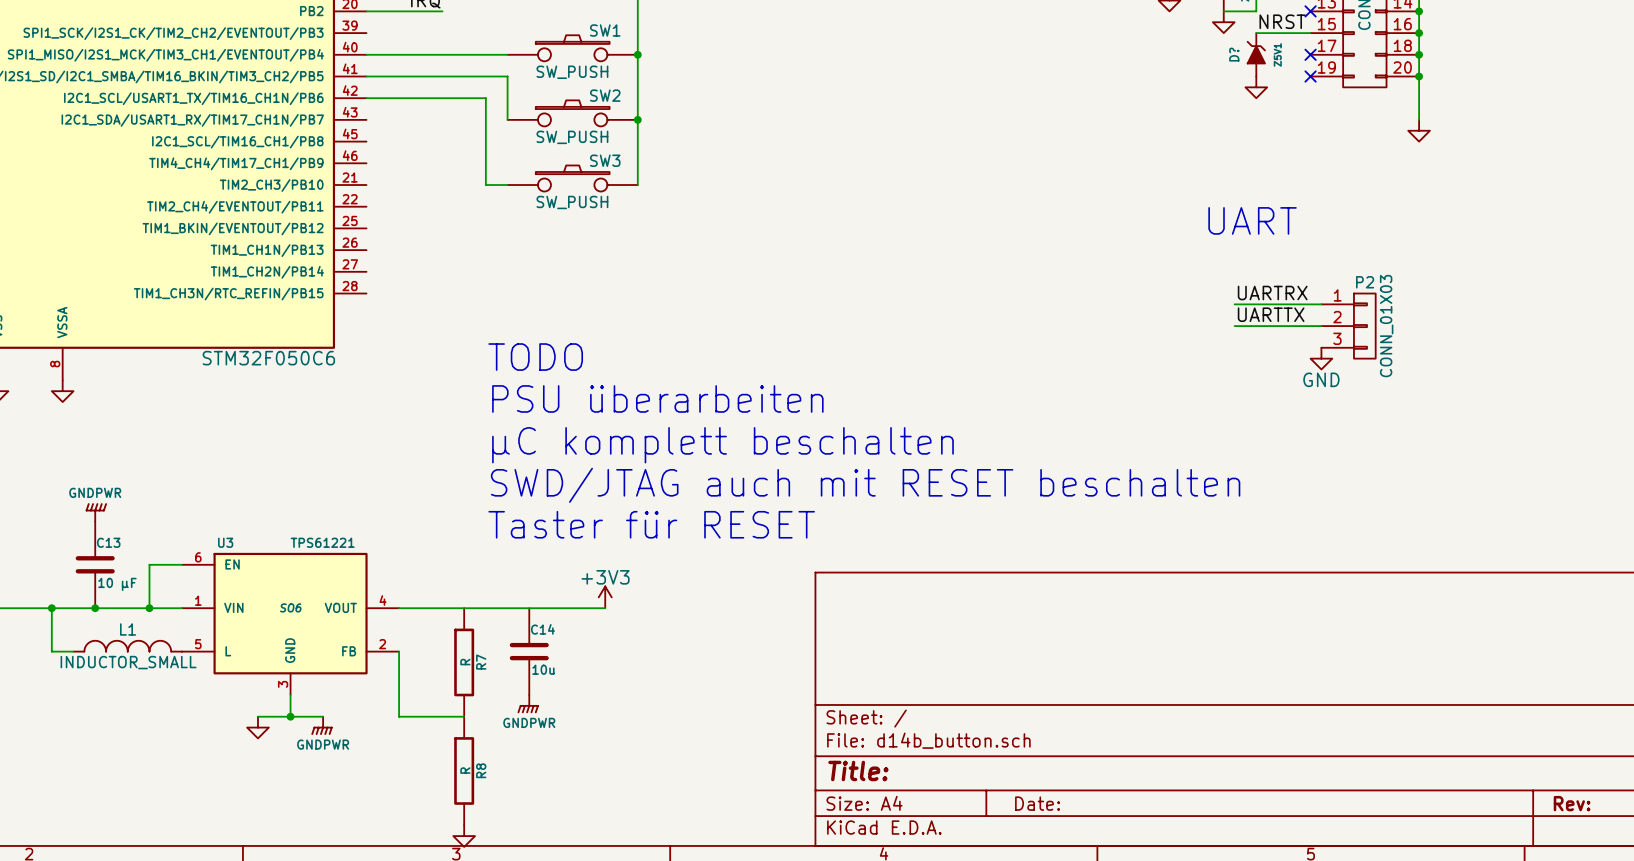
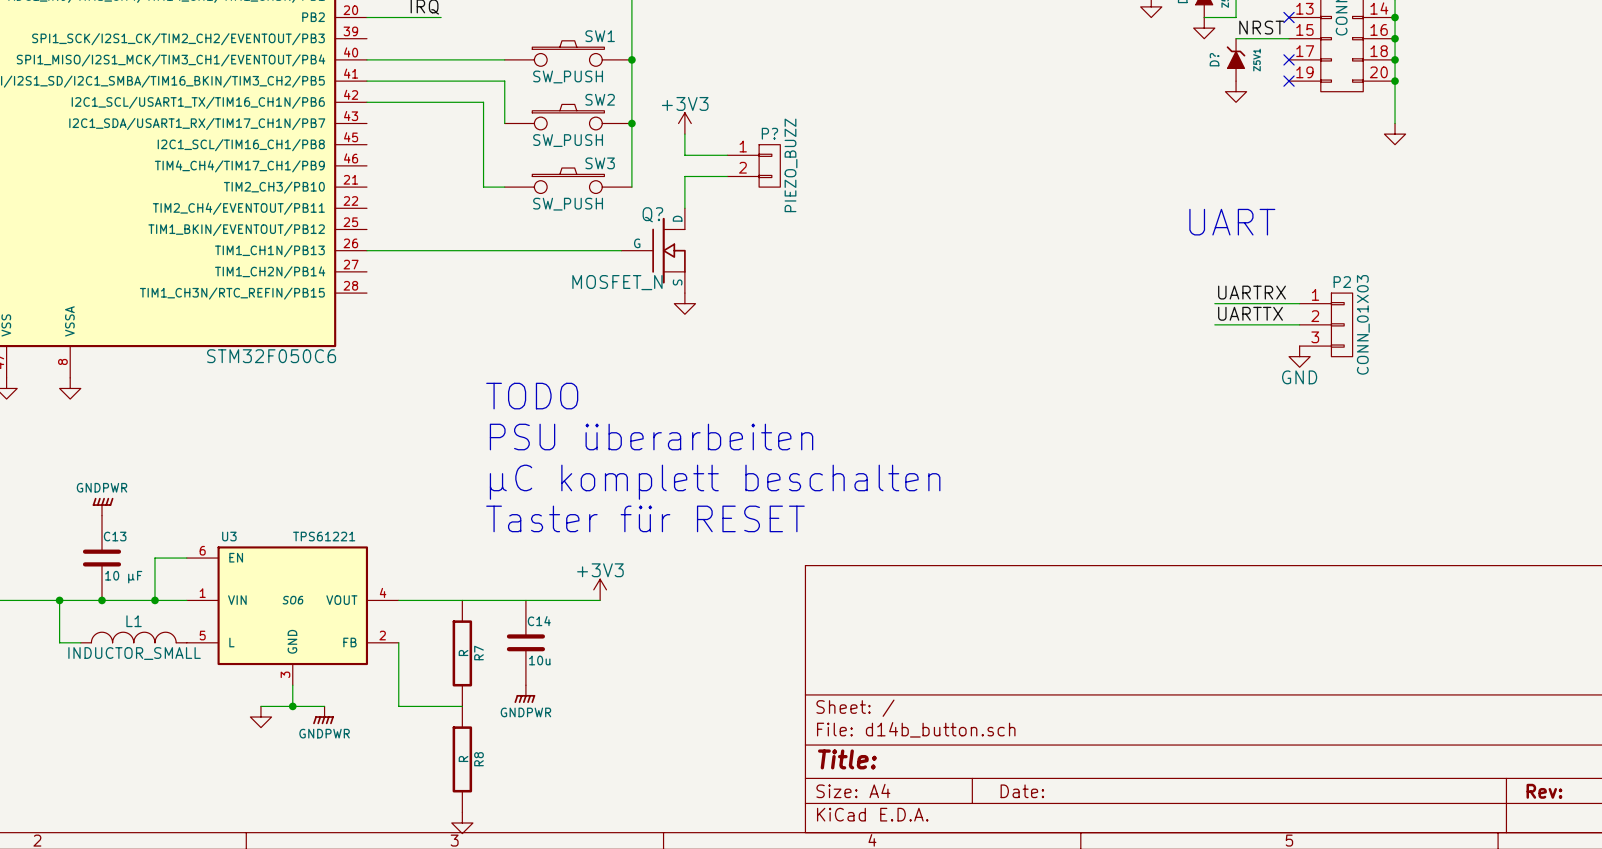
power symbol: none -> +3V3 (684, 123)
wire: none -> (684, 134) (684, 155) (727, 155)
P?: none -> PIEZO_BUZZ (753, 165)
wire: none -> (727, 176) (684, 176) (684, 208)
wire: none -> (366, 250) (621, 250)
Q?: none -> MOSFET_N (653, 250)
power symbol: none -> (684, 303)
text: TODO (535, 357) -> none
text: PSU überarbeiten (657, 398) -> TODO (532, 396)
text: µC komplett beschalten (722, 445) -> PSU überarbeiten (651, 437)
text: SWD/JTAG auch mit RESET beschalten (865, 485) -> µC komplett beschalten (715, 482)

